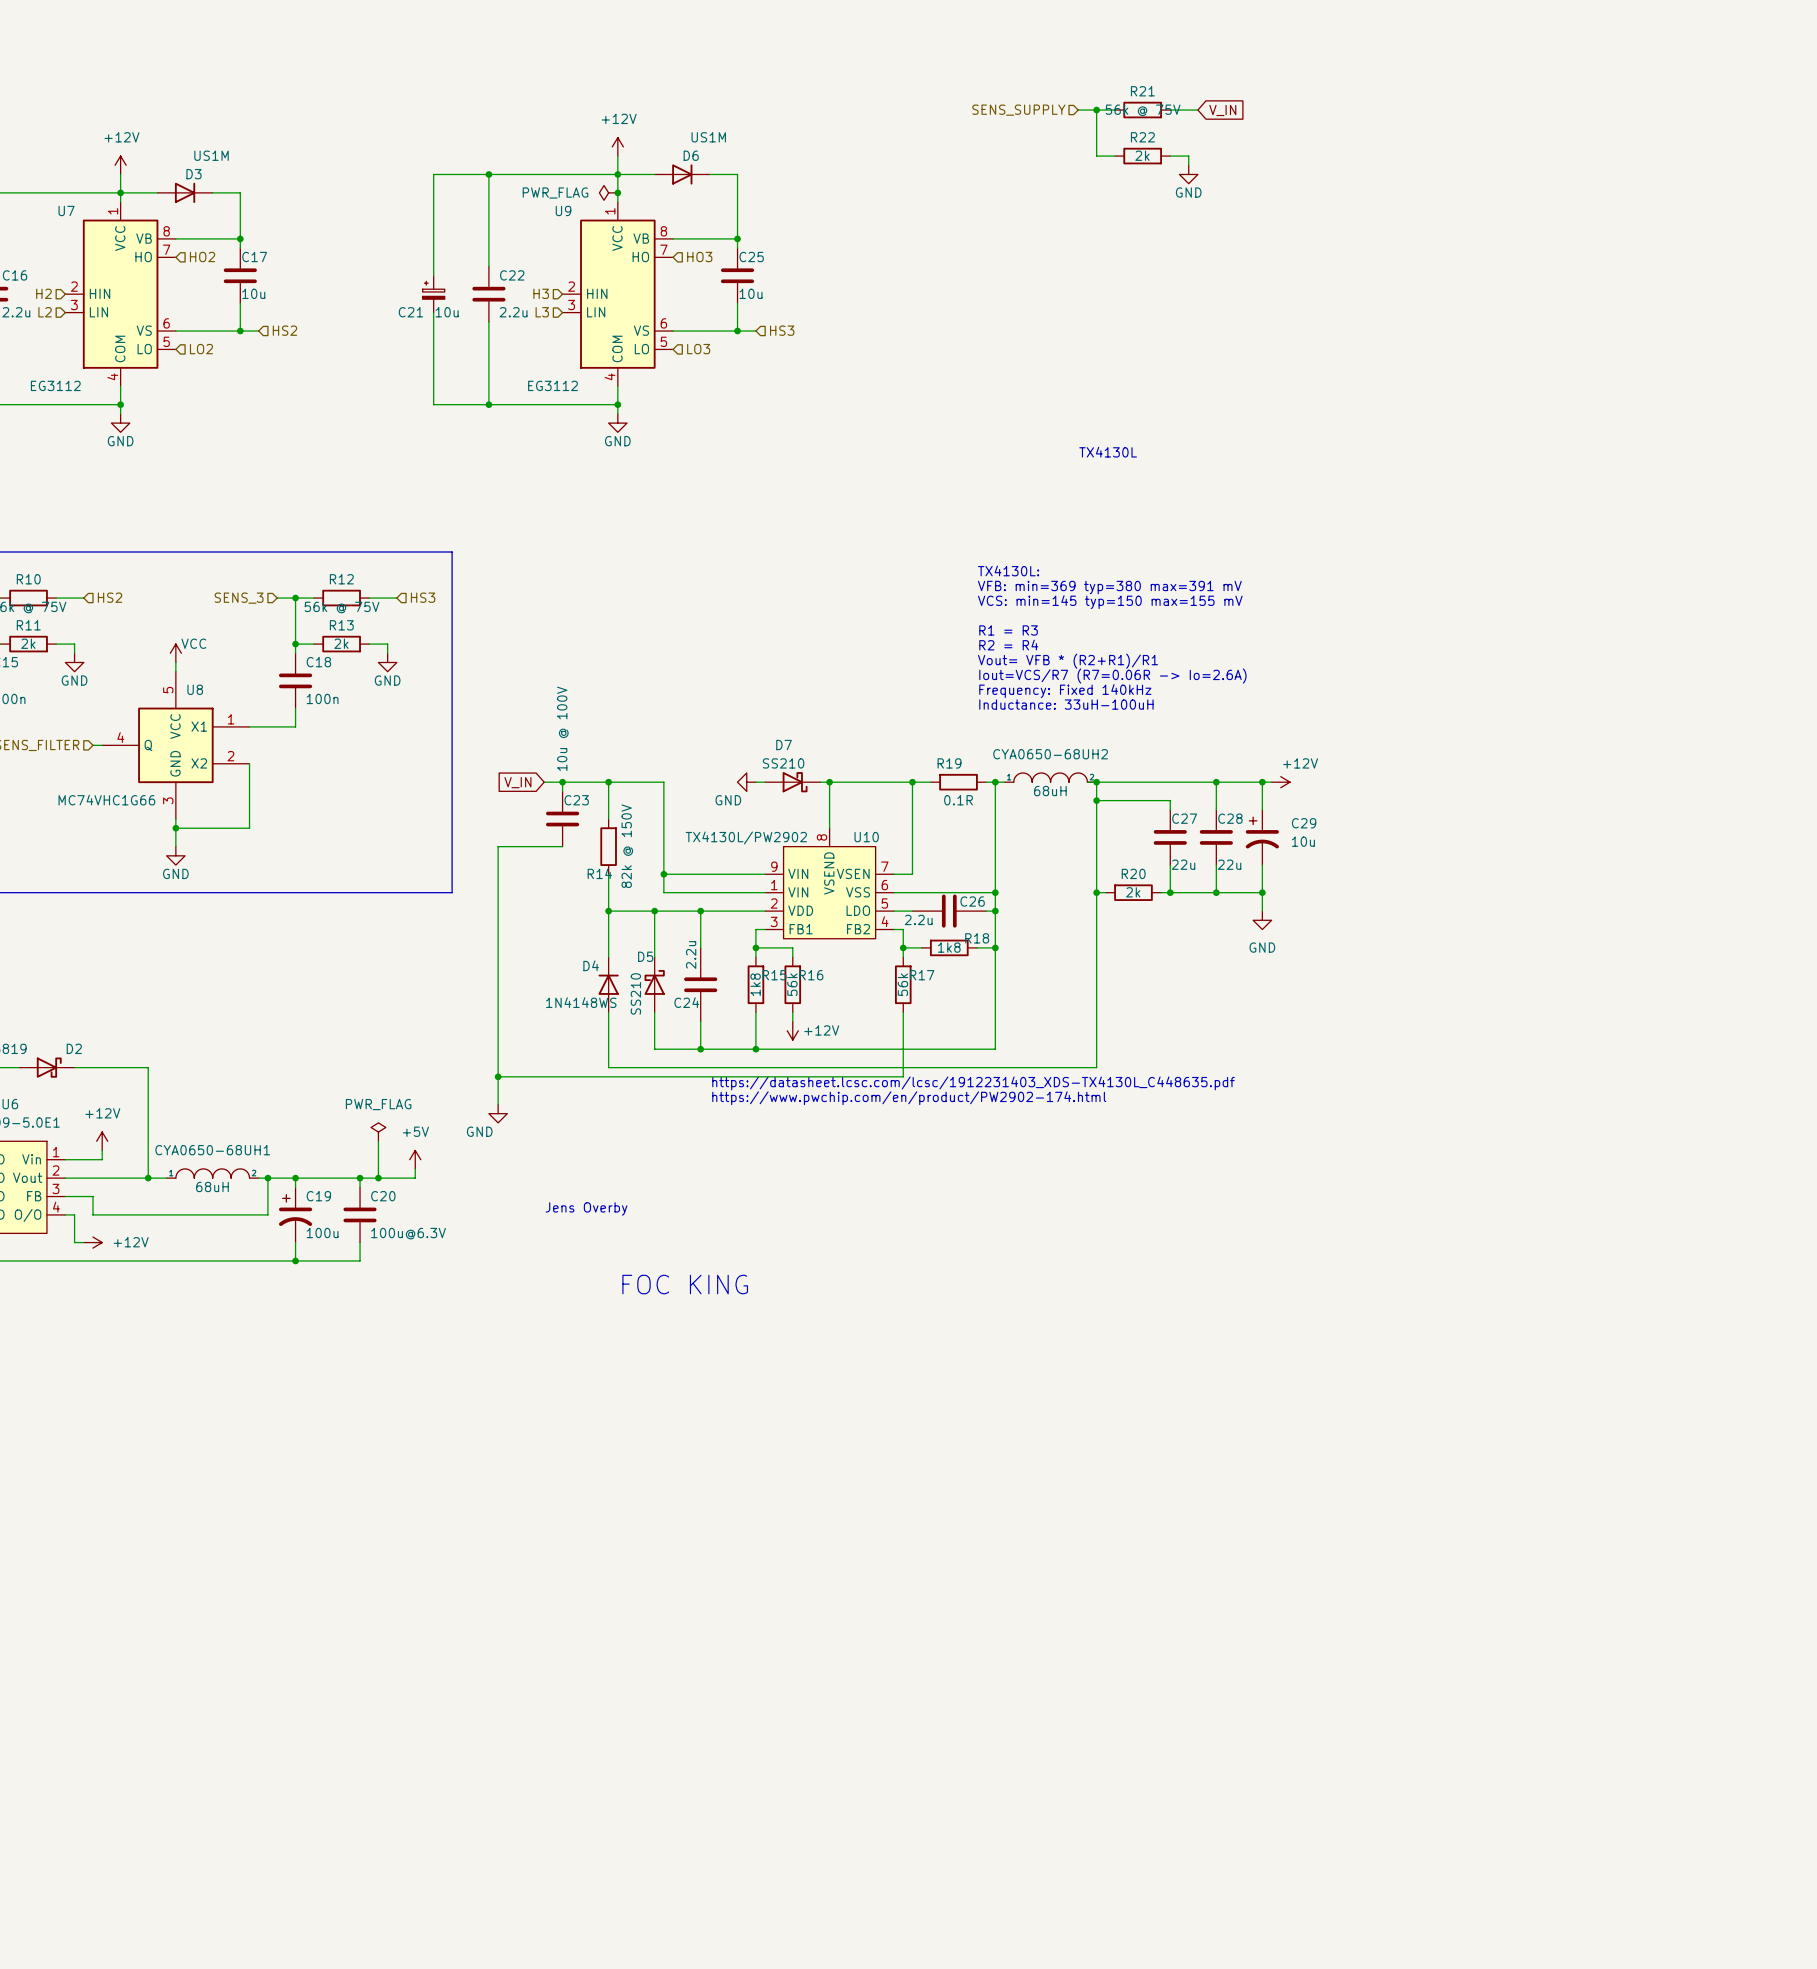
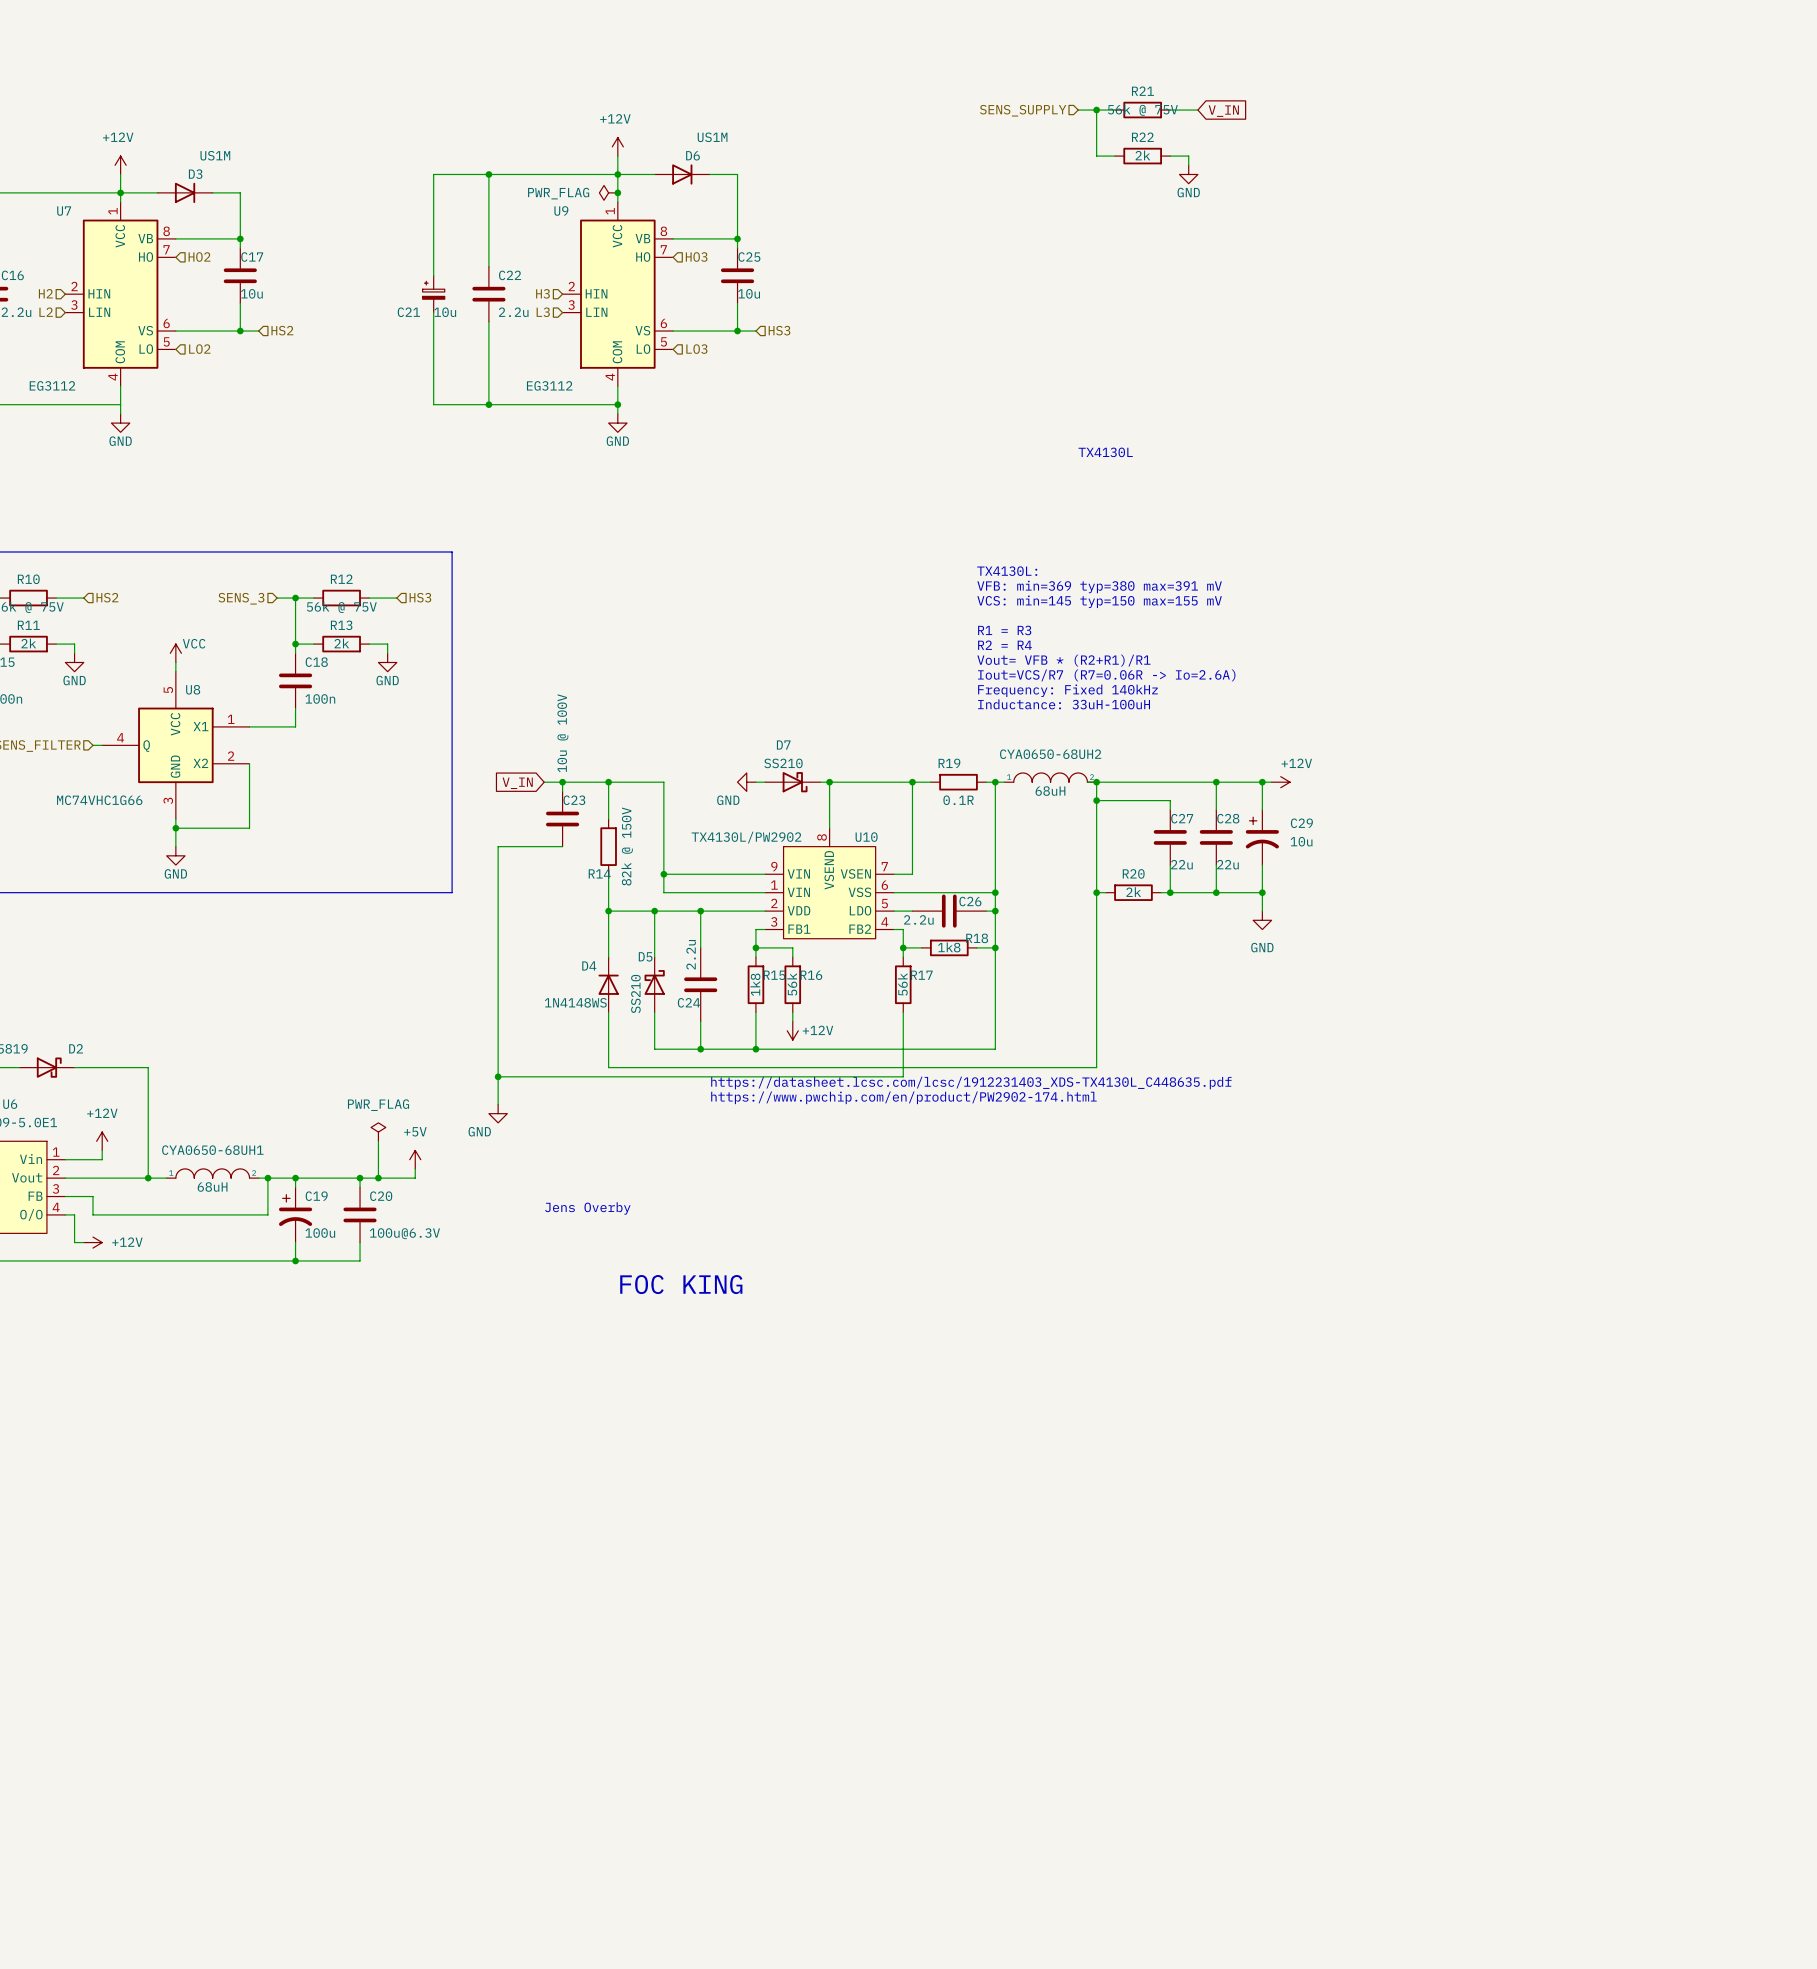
junction: (120, 404) -> none

